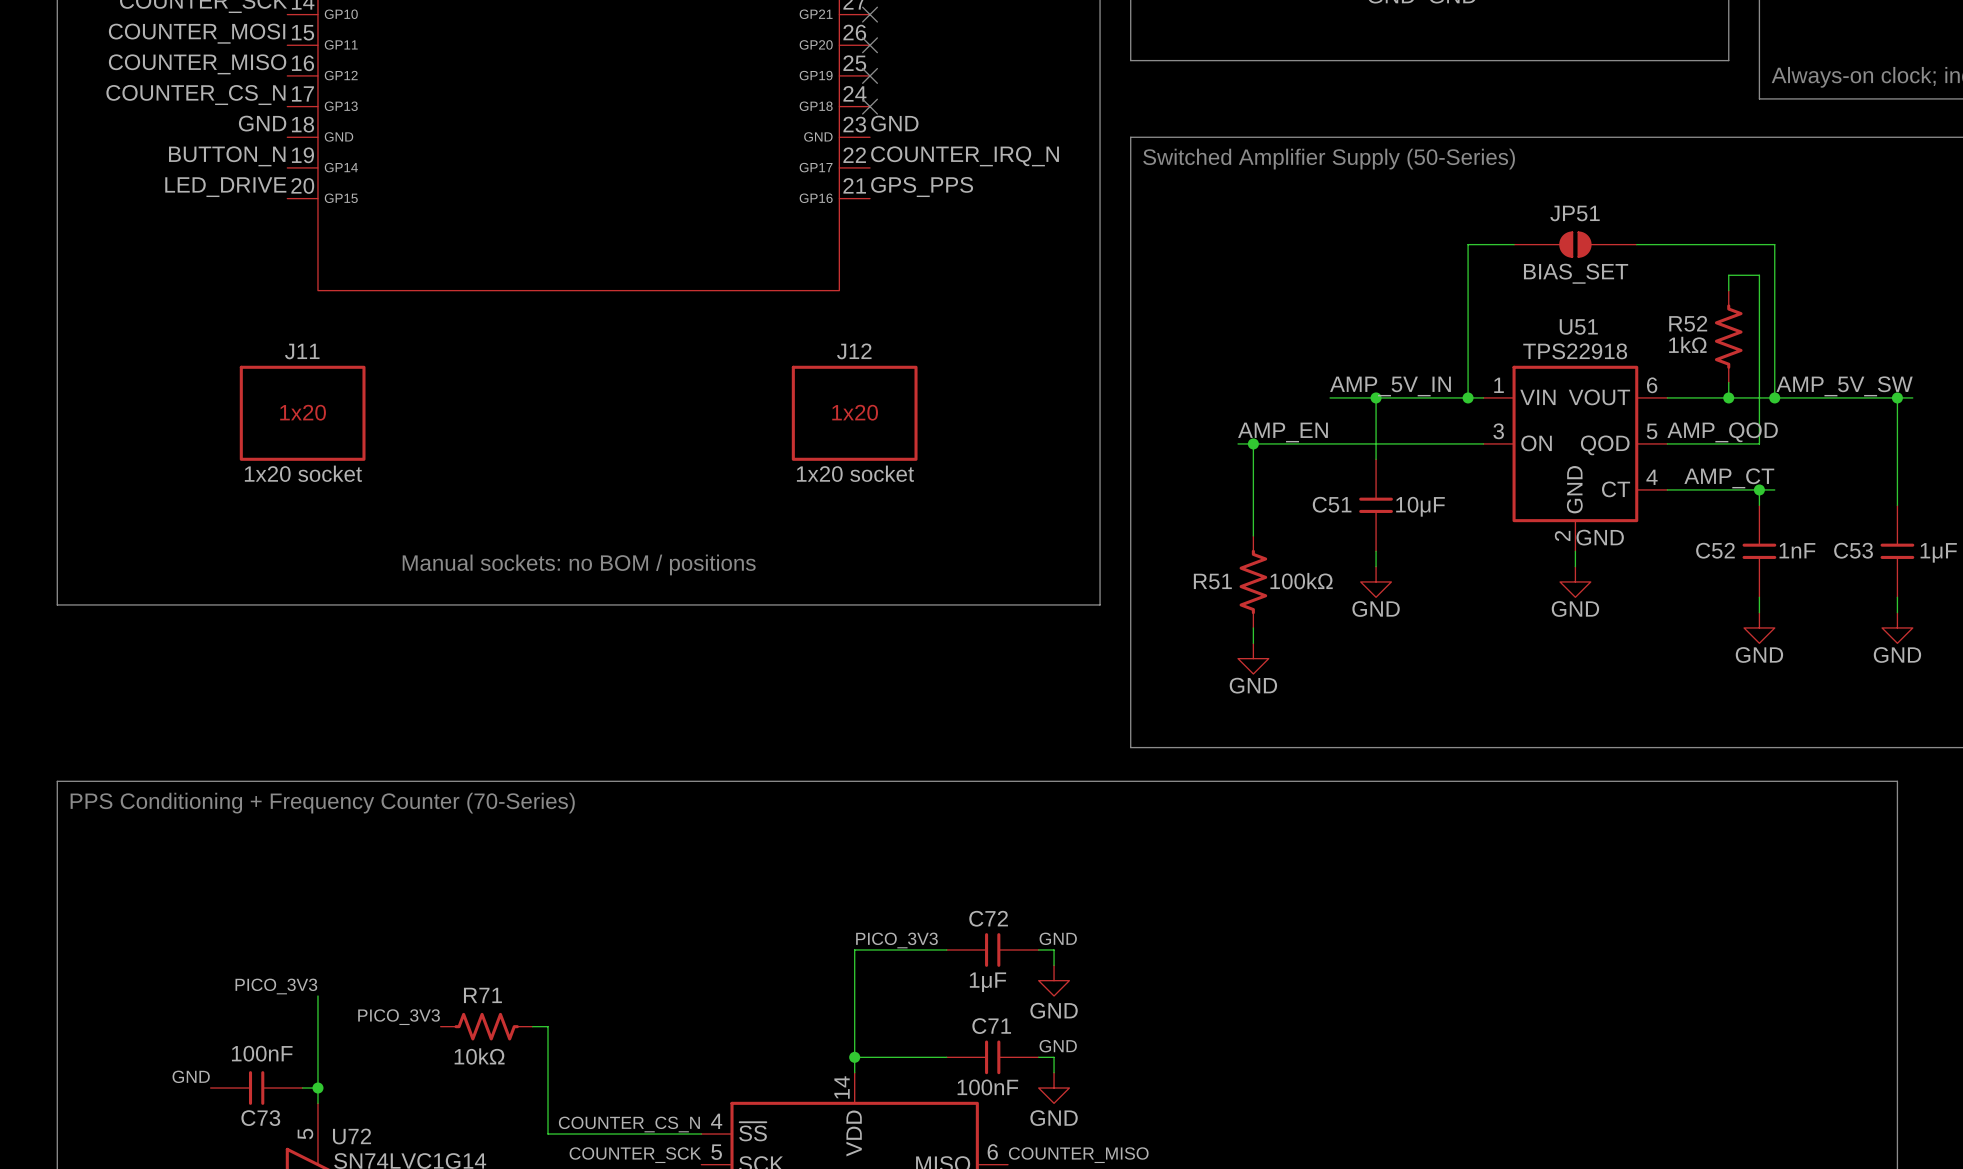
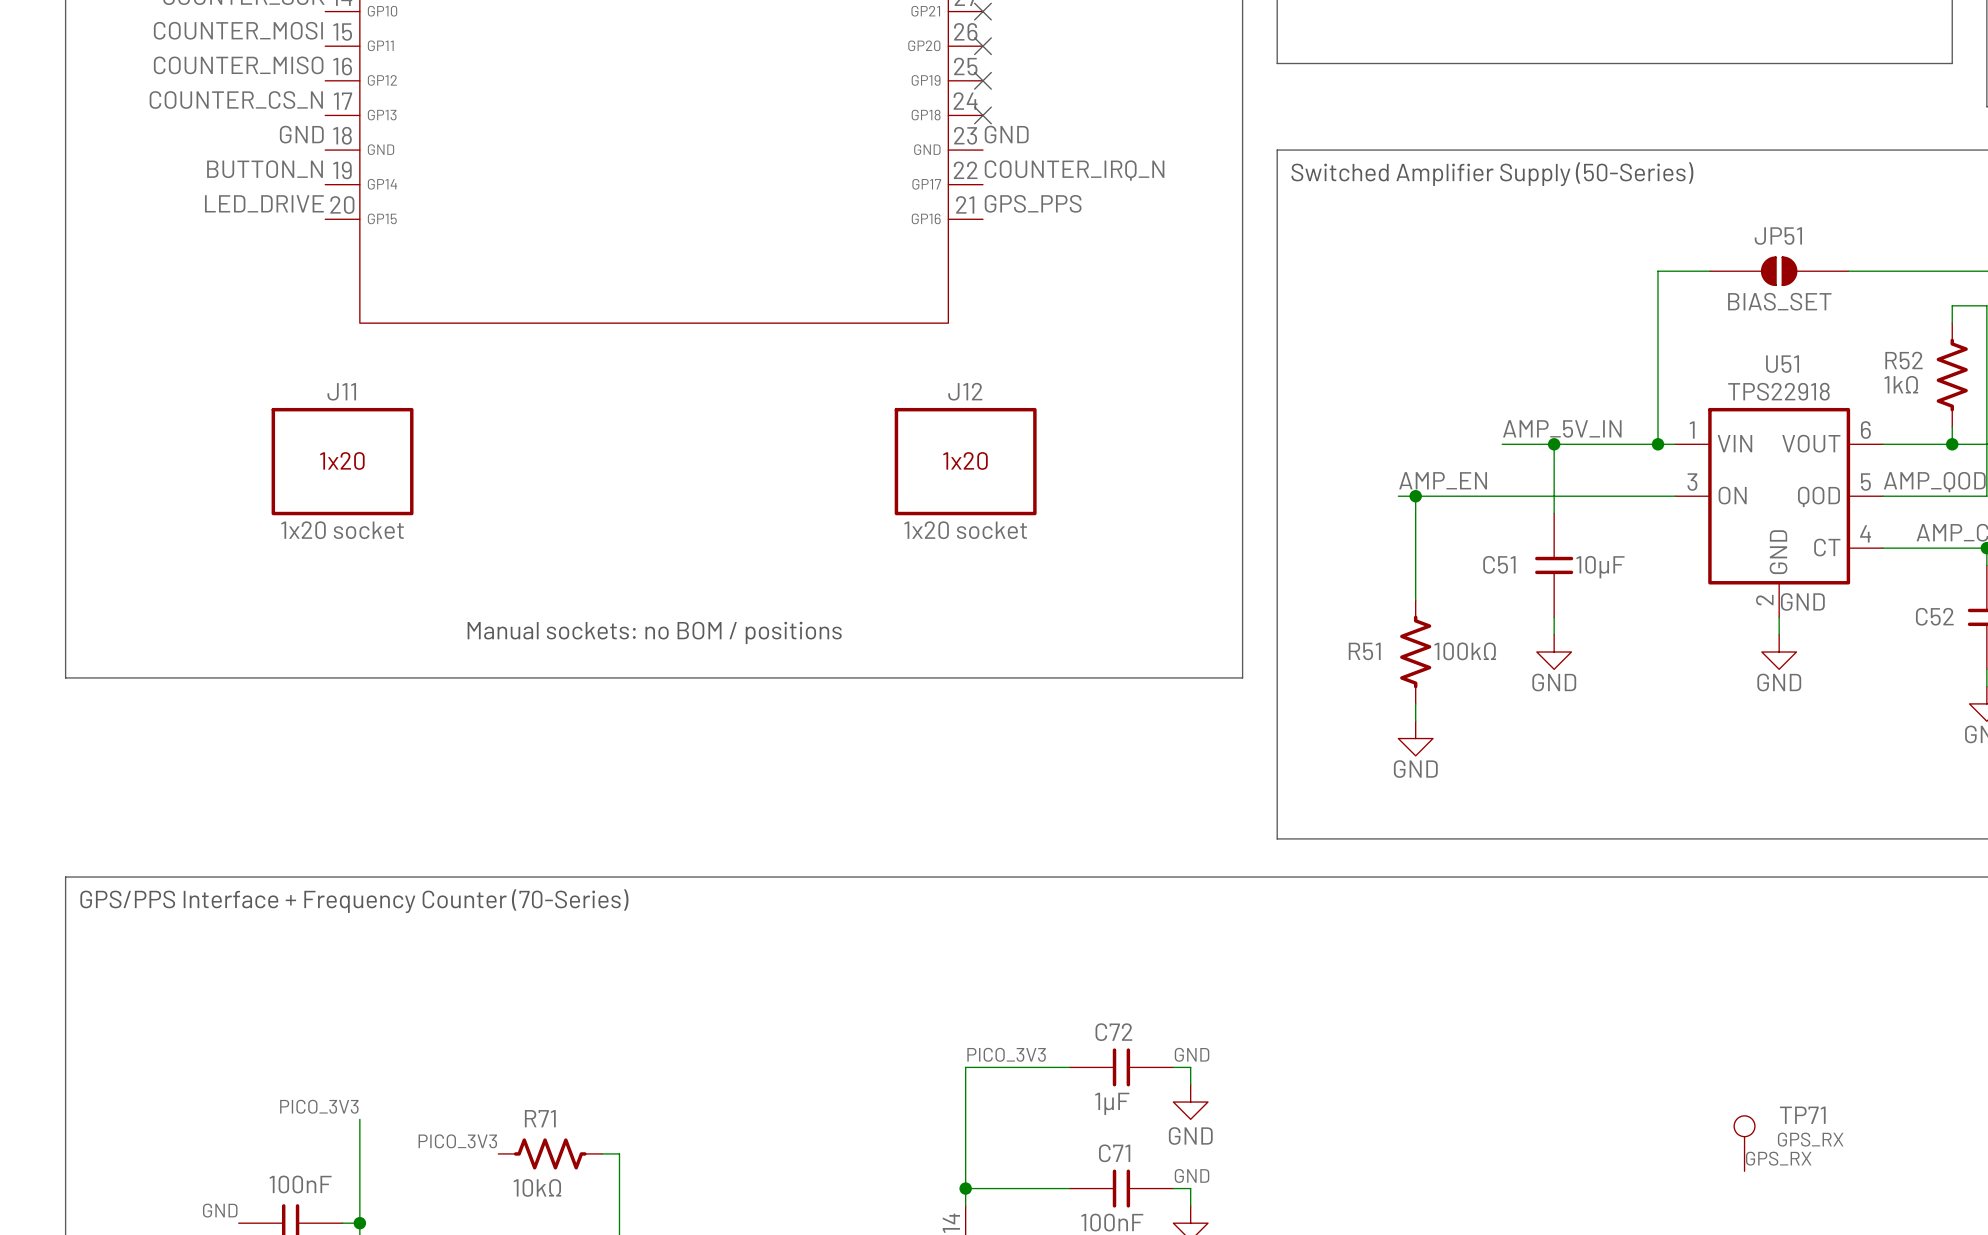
text: PPS Conditioning + Frequency Counter (70-Series) (322, 803) -> GPS/PPS Interface + Frequency Counter (70-Series) (354, 901)
TP71: none -> GPS_RX (1744, 1143)
label: none -> GPS_RX (1778, 1158)

